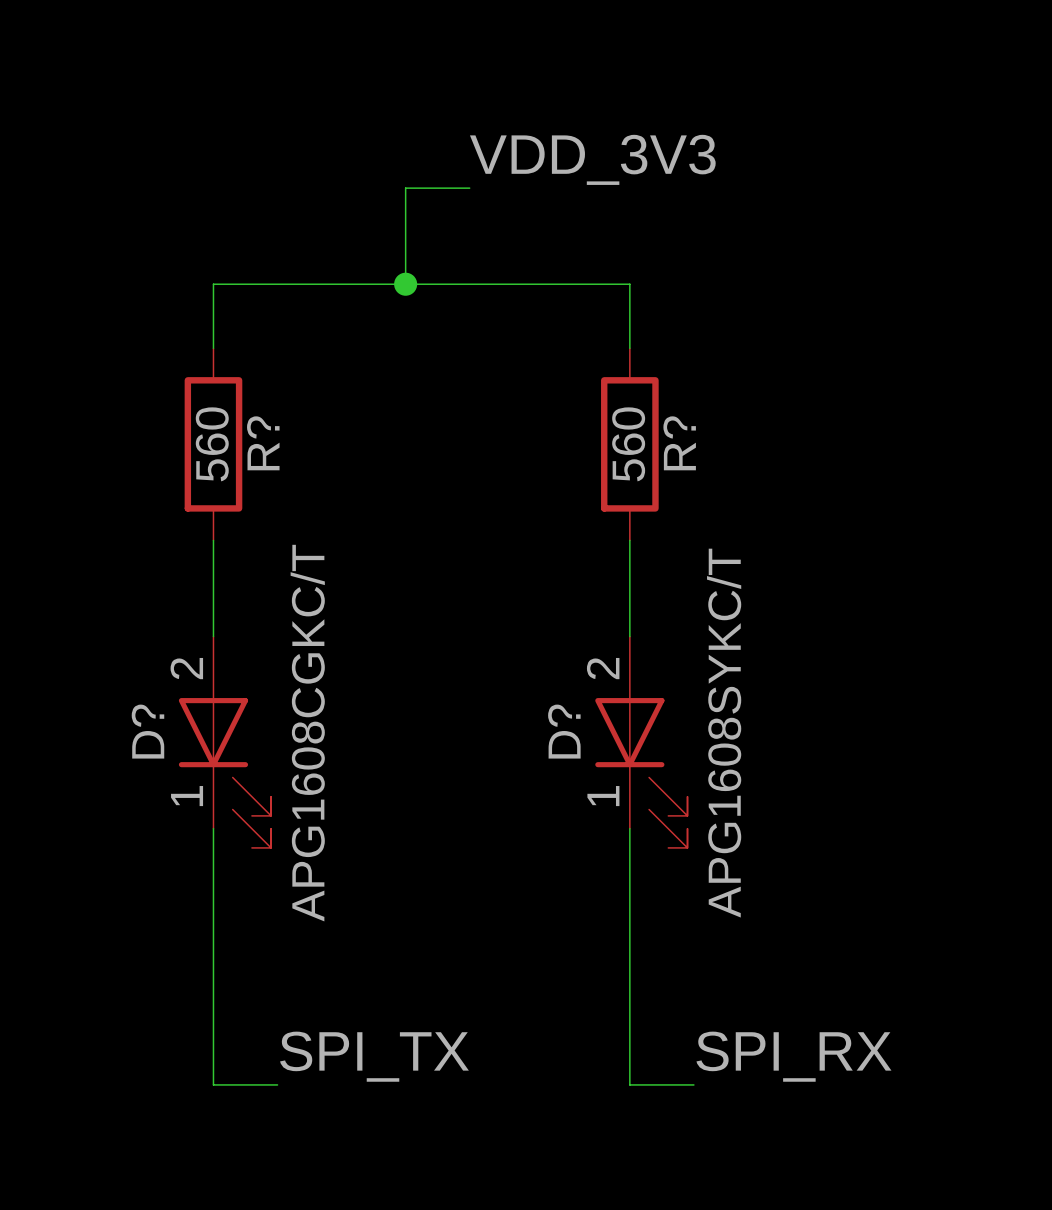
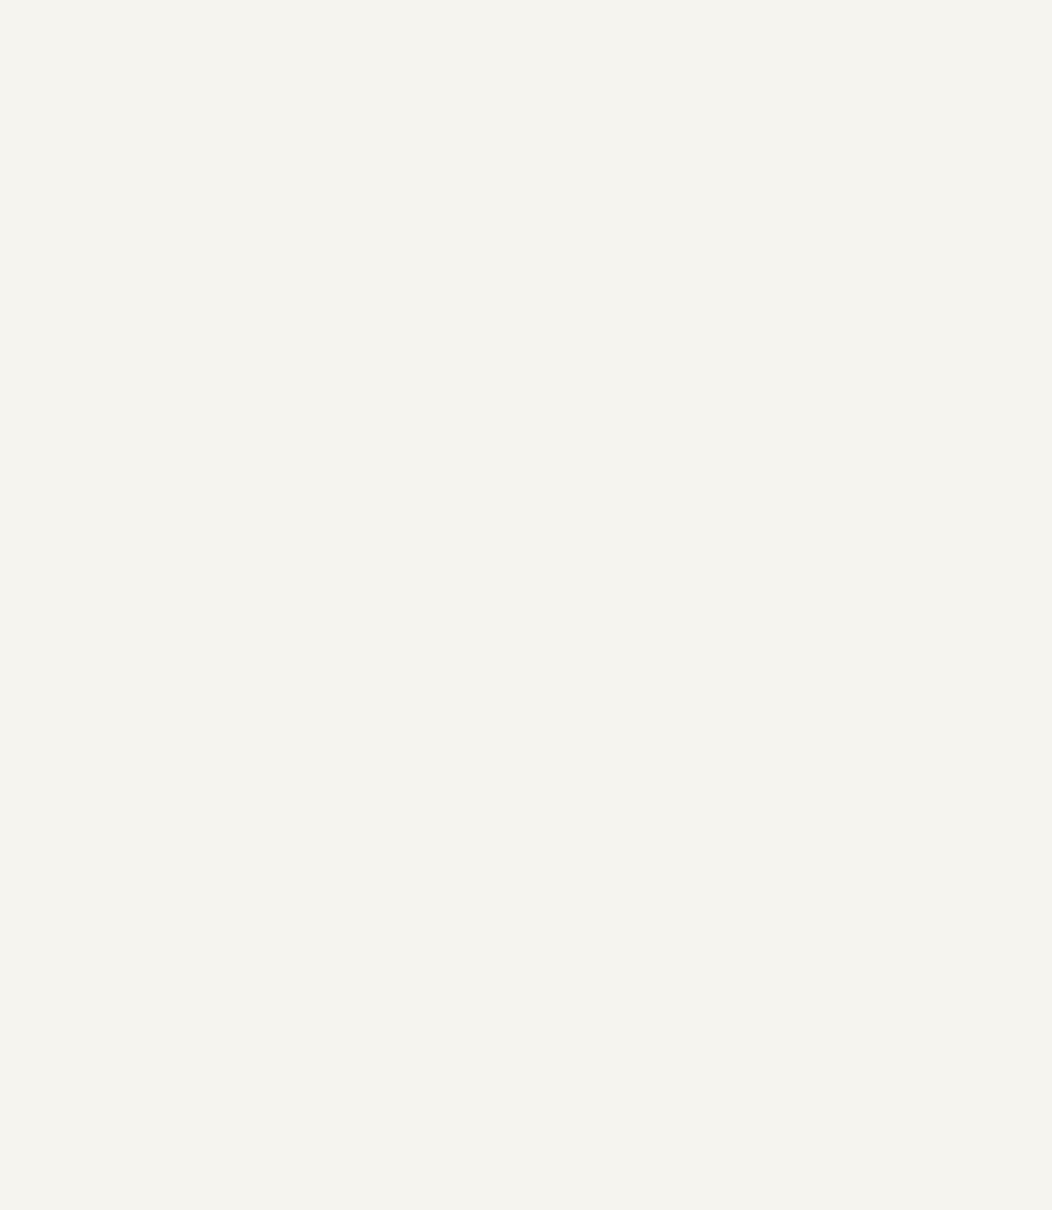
label: VDD_3V3 (592, 159) -> none
wire: (469, 188) (405, 188) (405, 284) -> none
junction: (405, 284) -> none
wire: (213, 348) (213, 284) (629, 284) (629, 348) -> none
R?: 560 (213, 444) -> none
R?: 560 (629, 444) -> none
wire: (213, 540) (213, 636) -> none
wire: (629, 540) (629, 636) -> none
D?: APG1608CGKC/T (225, 742) -> none
D?: APG1608SYKC/T (641, 742) -> none
wire: (213, 828) (213, 1084) (277, 1084) -> none
wire: (629, 828) (629, 1084) (693, 1084) -> none
label: SPI_TX (374, 1056) -> none
label: SPI_RX (793, 1056) -> none

